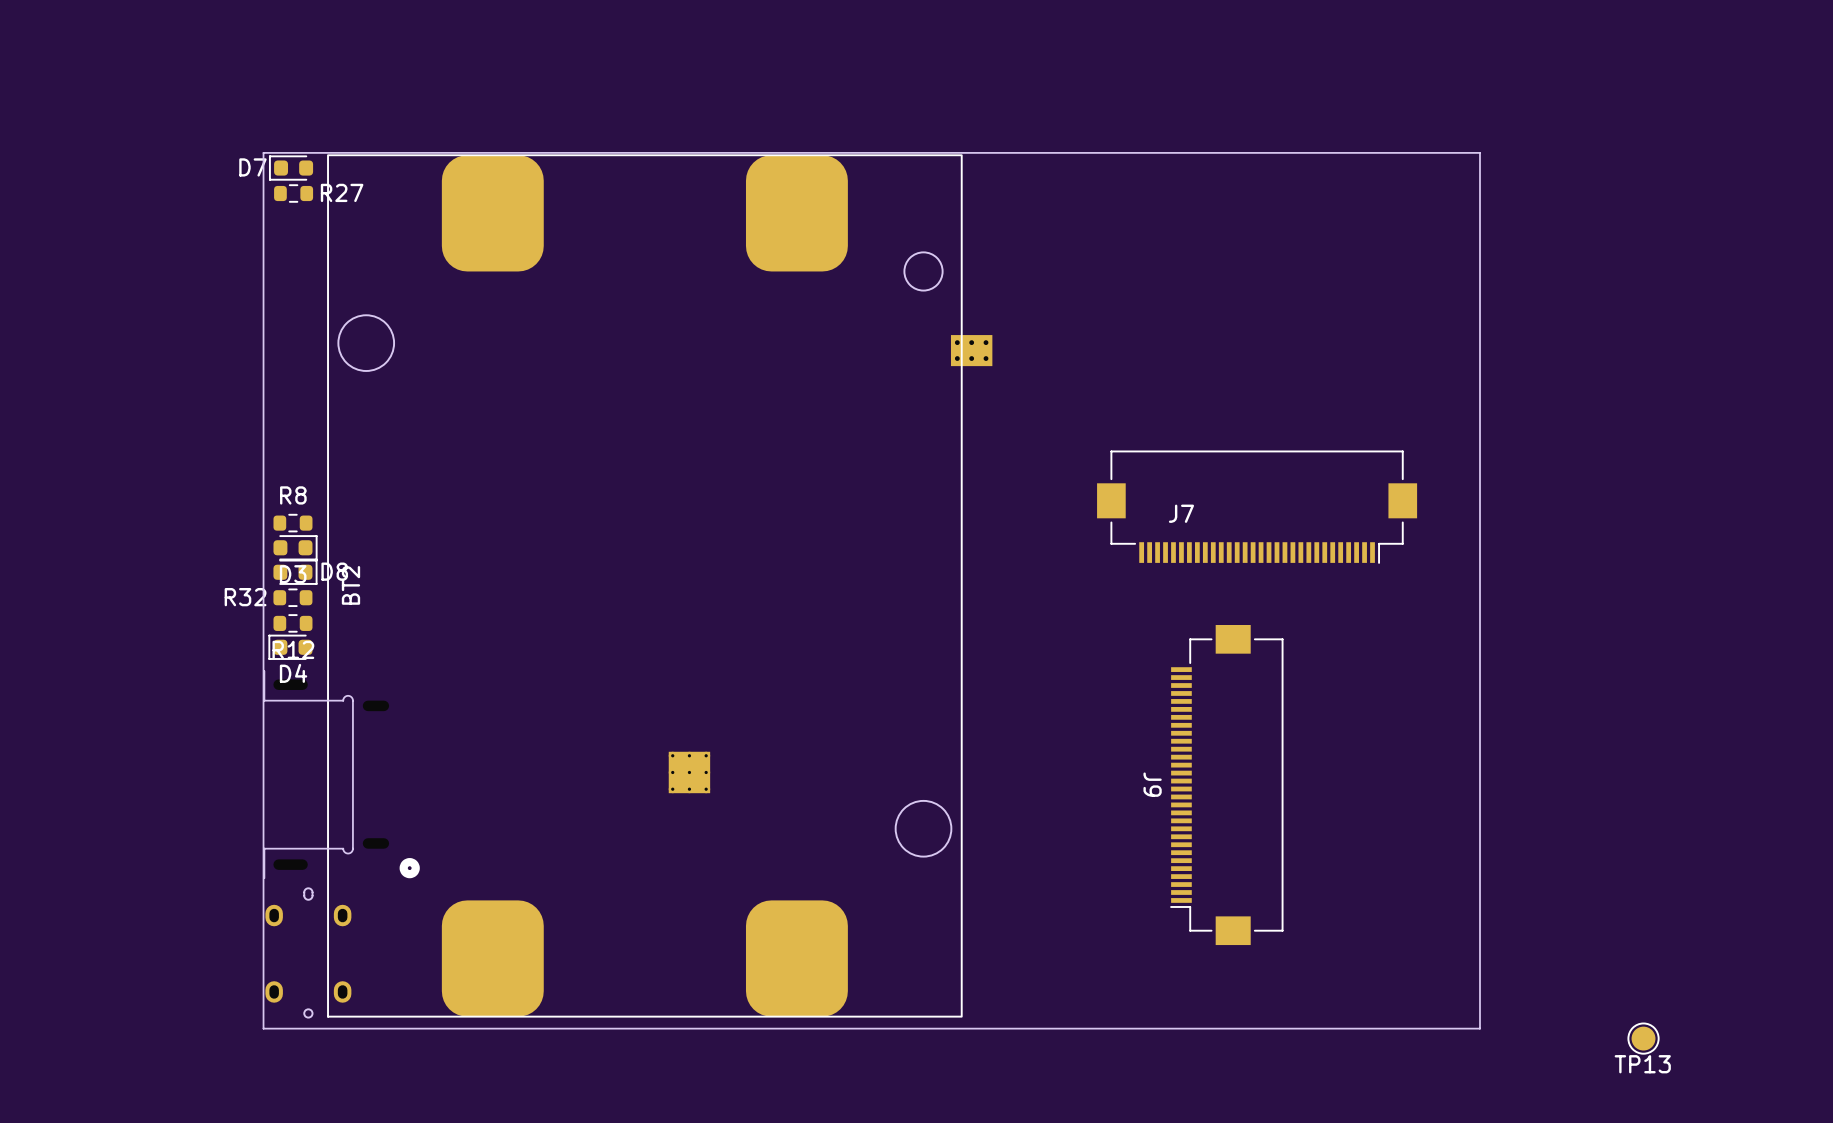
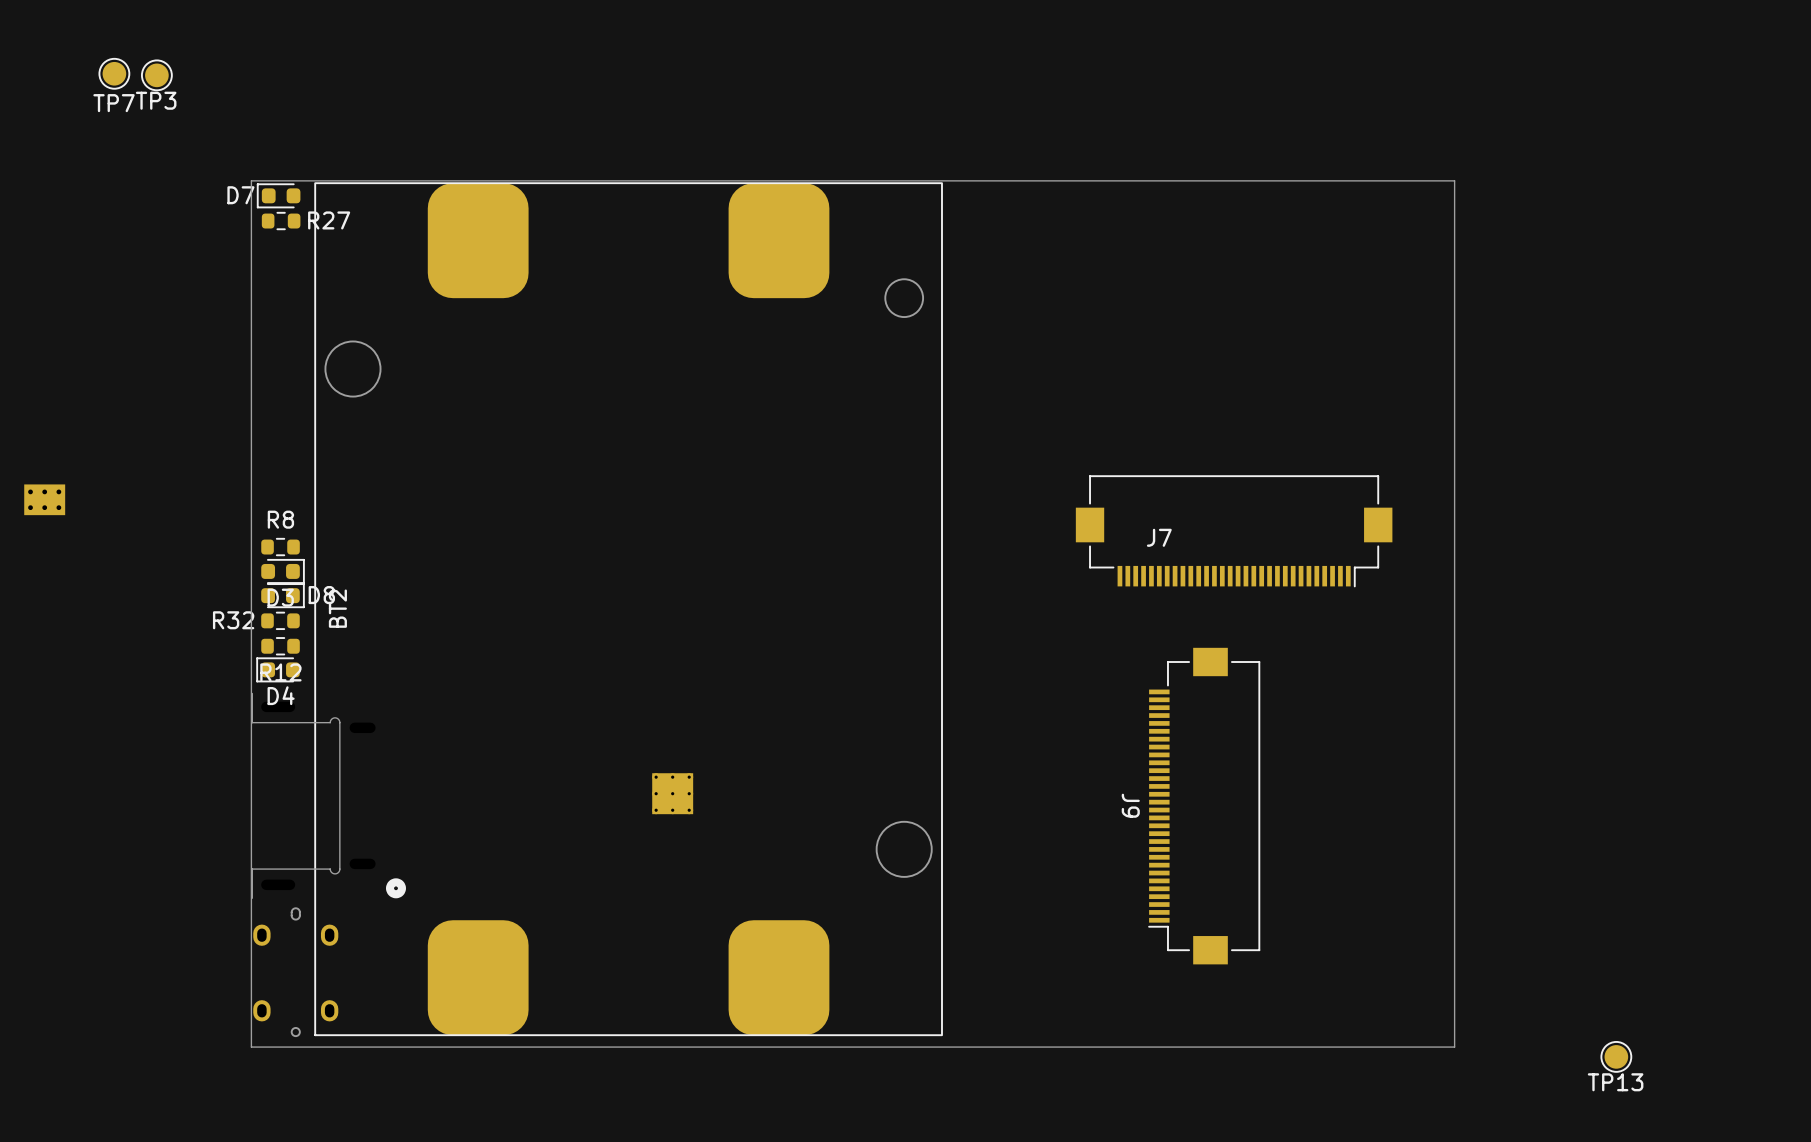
TP7: none -> (114, 73)
TP3: none -> (156, 75)
part: (971, 350) -> none
part: none -> (44, 499)

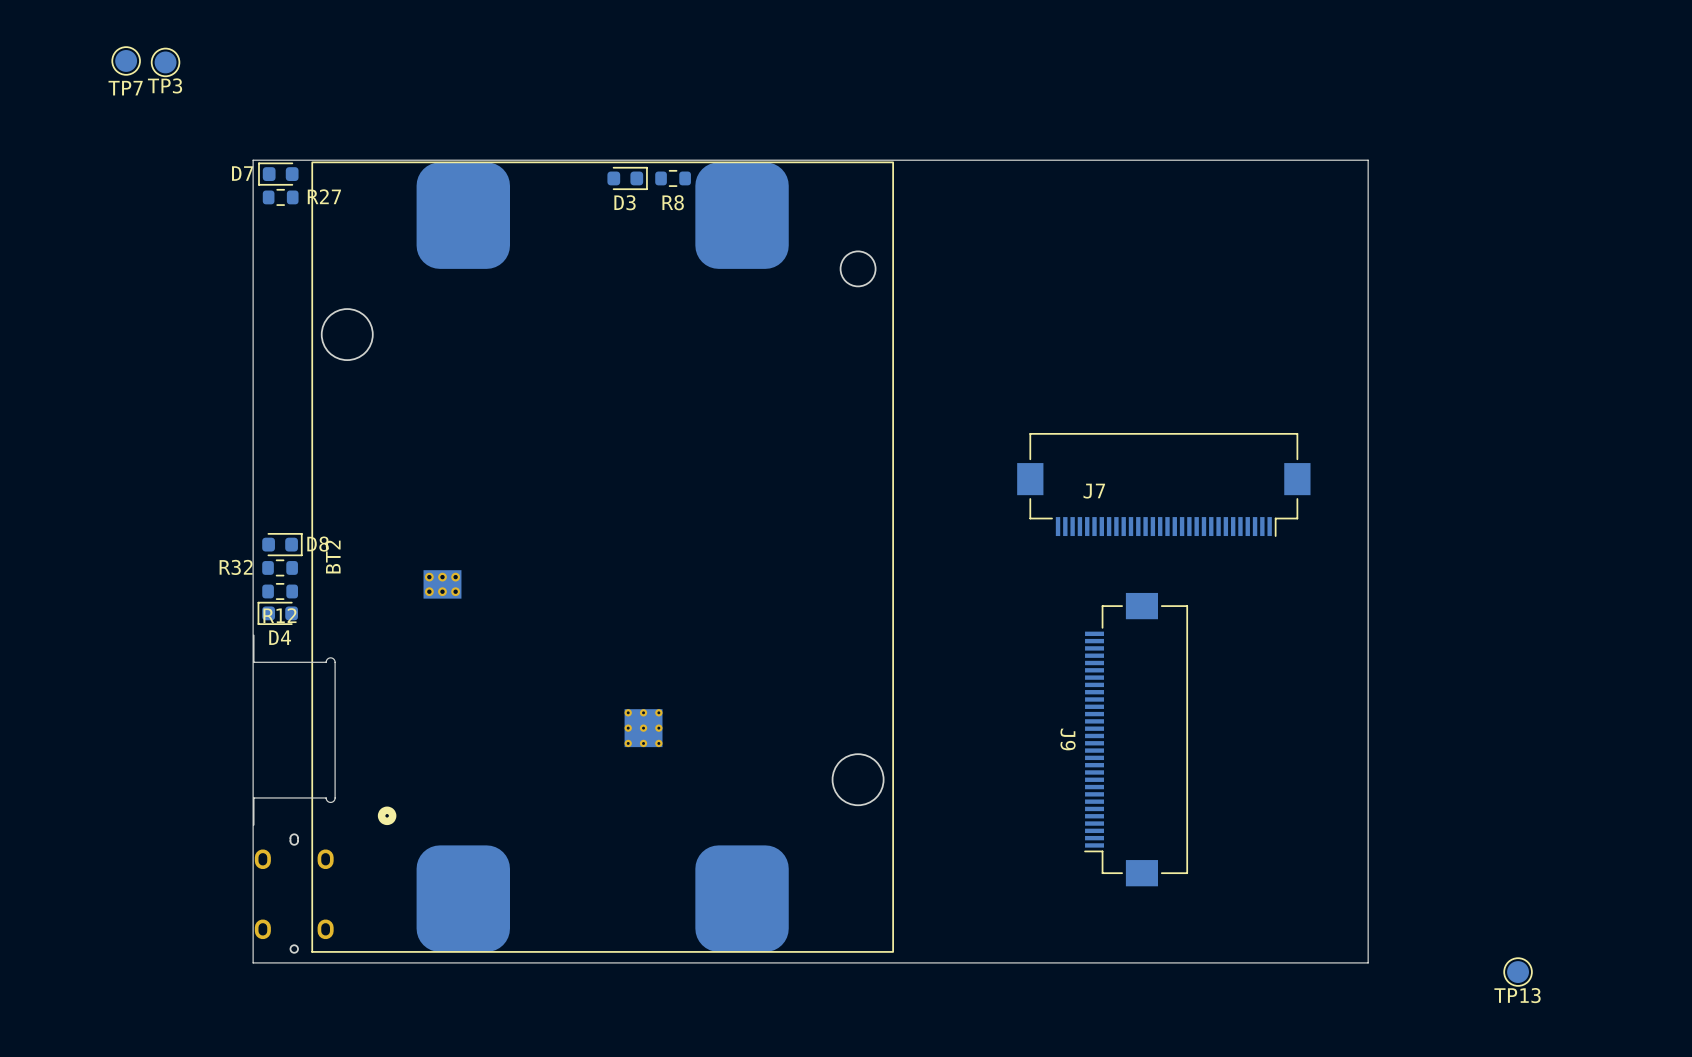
part: (44, 499) -> none
R8 name position: R8 (280, 519) -> R8 (673, 202)
R8 position: (280, 547) -> (673, 178)
D3 position: (283, 571) -> (627, 178)
part: none -> (442, 584)

